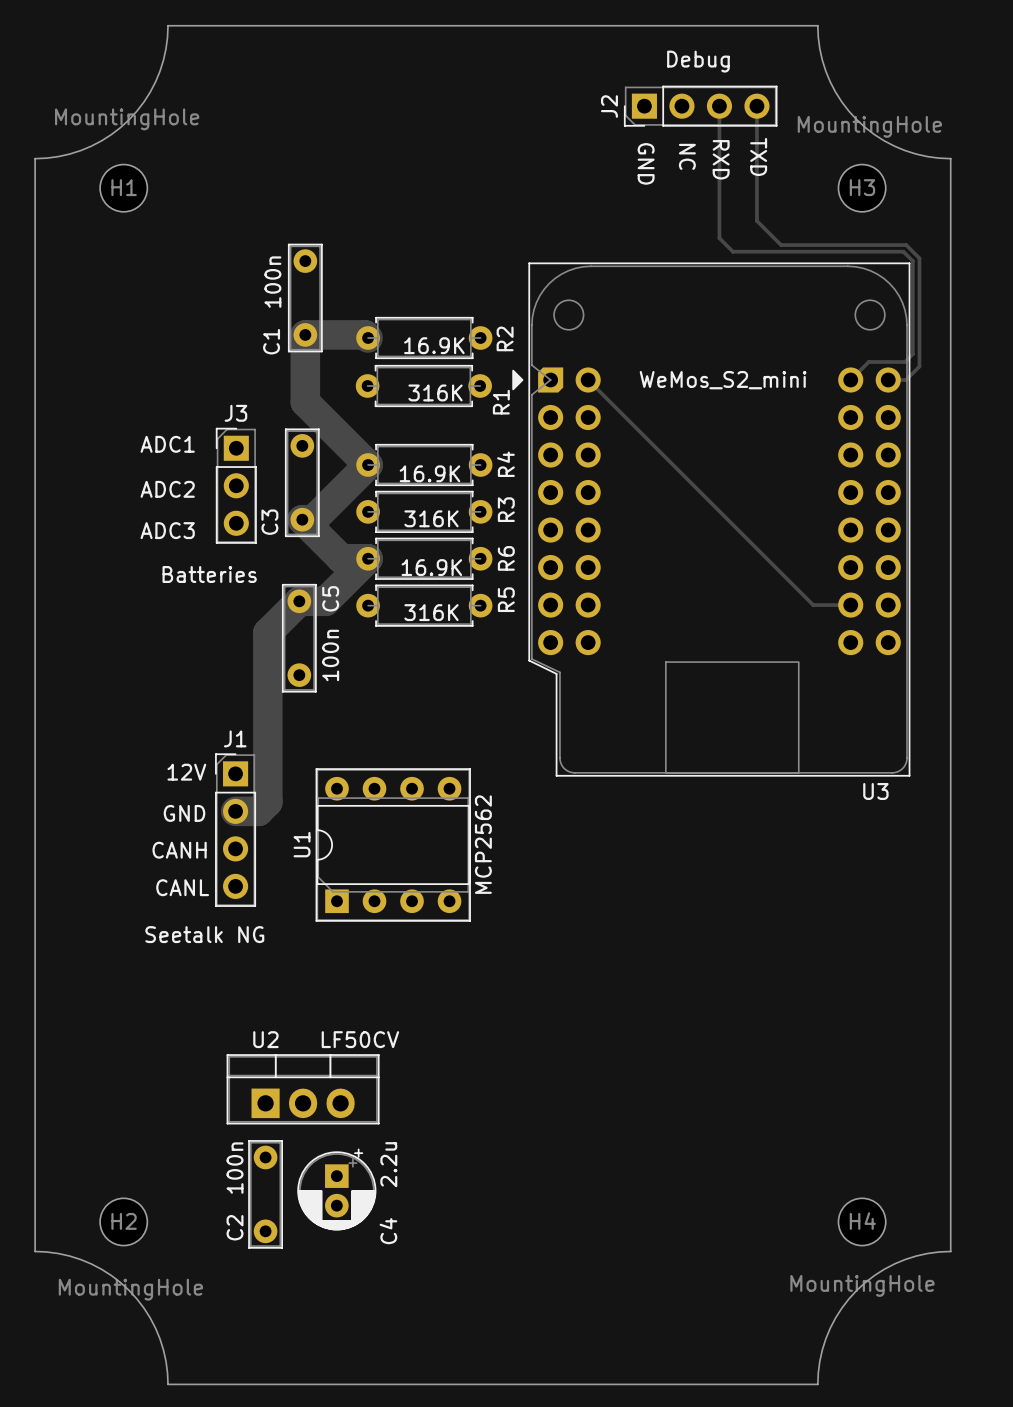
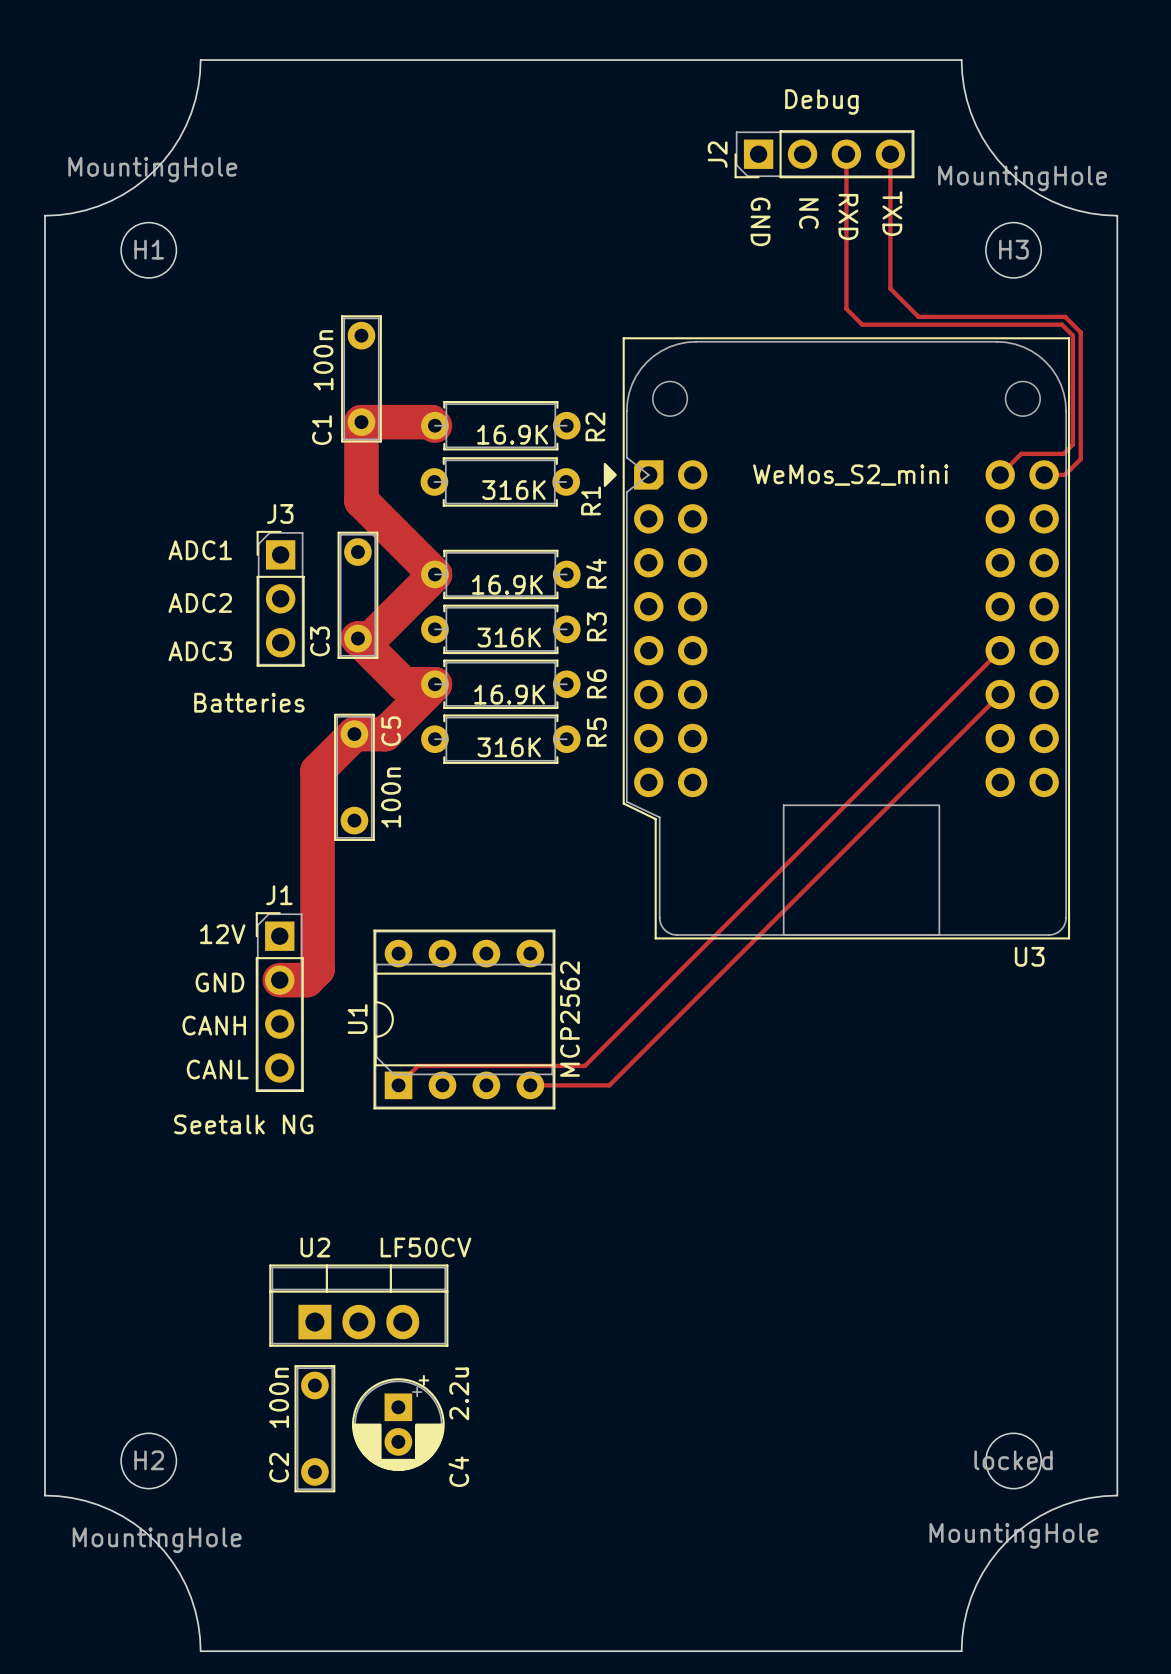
track: (588, 380) (813, 605) (850, 605) -> none
track: none -> (1000, 650) (584, 1065) (418, 1065) (398, 1085)
track: none -> (1000, 694) (609, 1085) (530, 1085)
H4 text: none -> locked (1013, 1460)
H4 name: H4 (862, 1221) -> none

